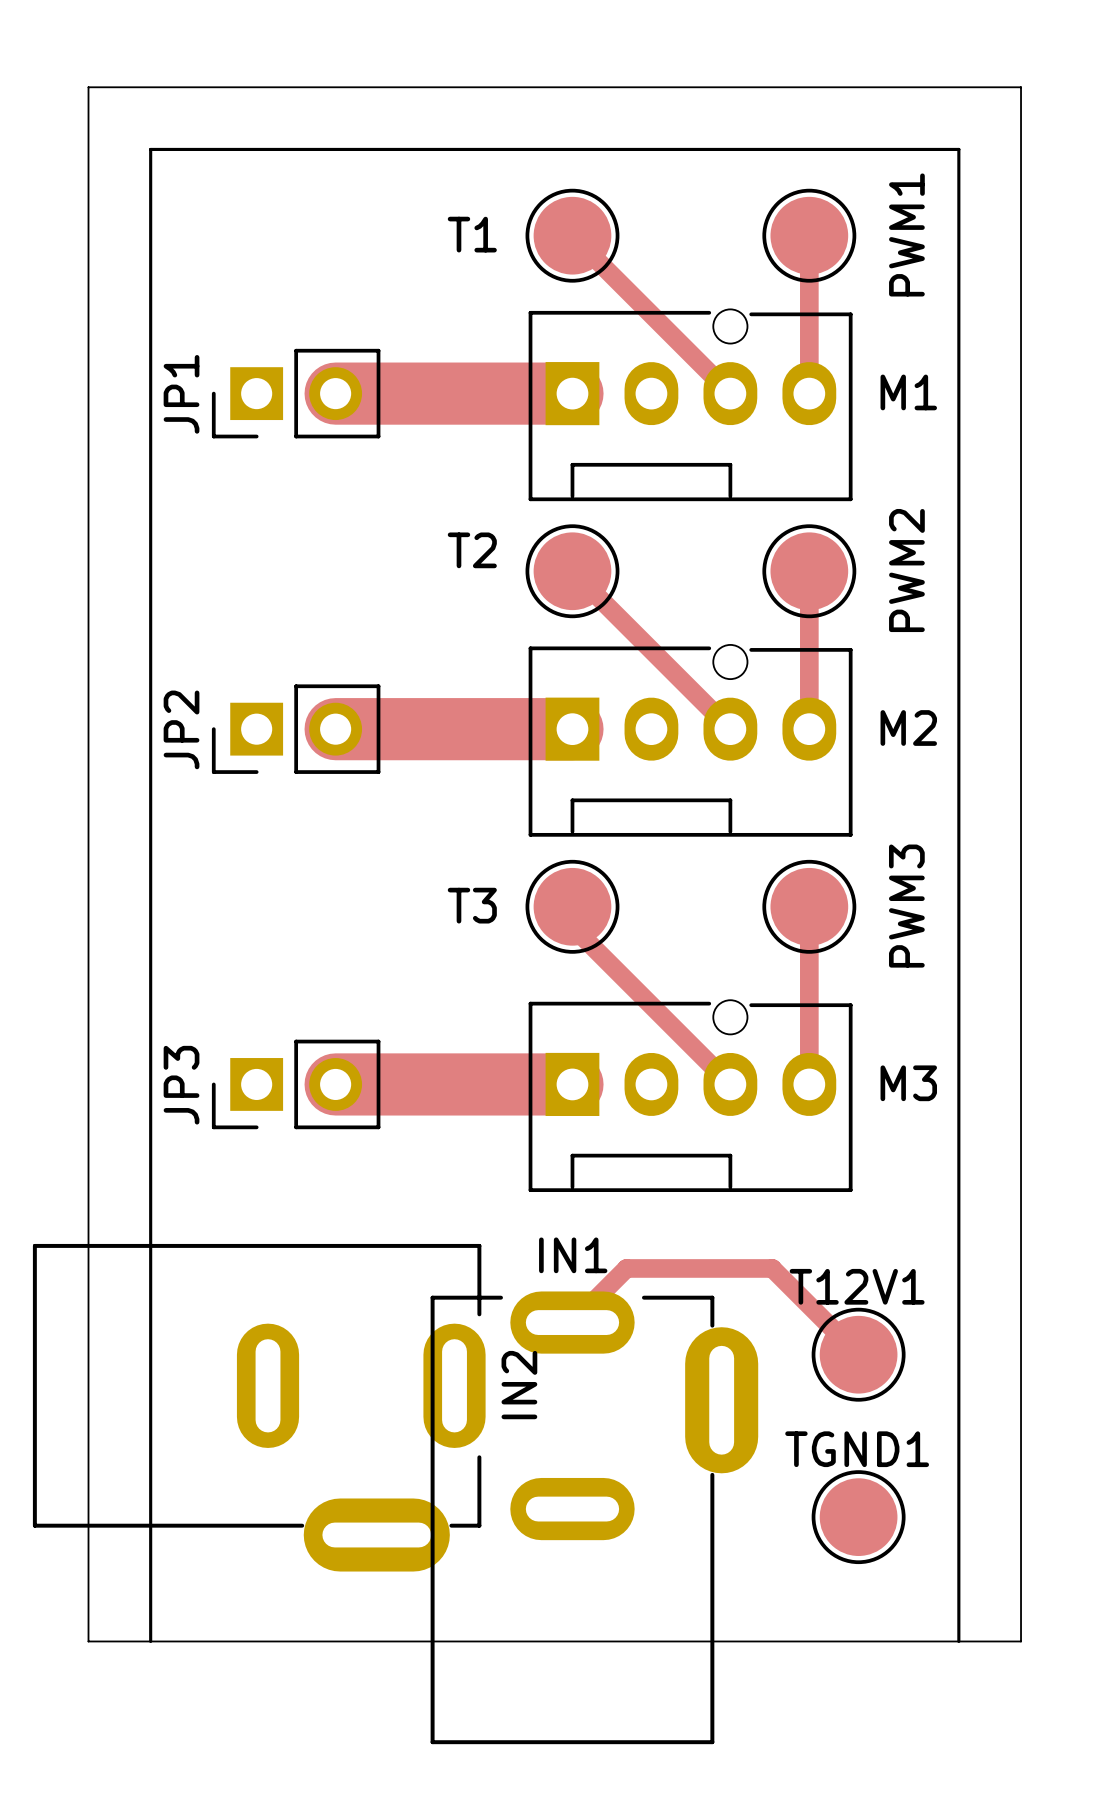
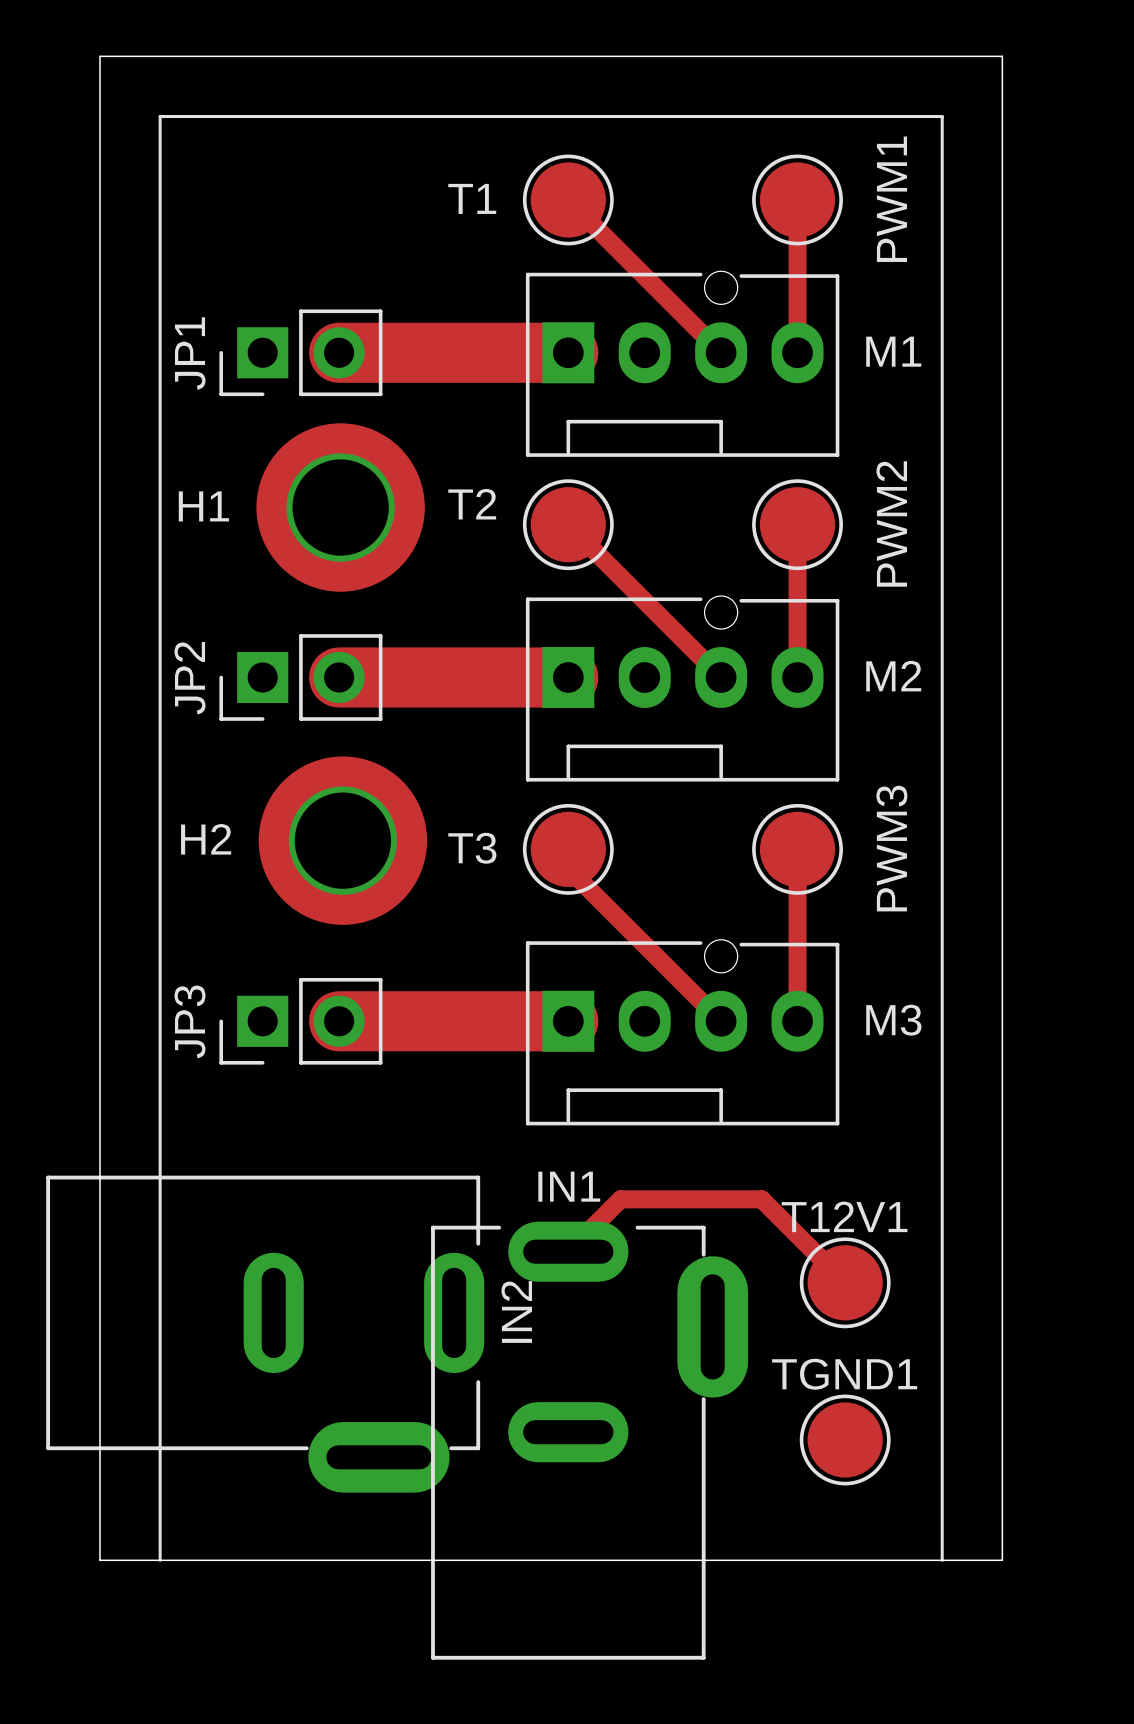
H1: none -> (340, 507)
H2: none -> (342, 840)

